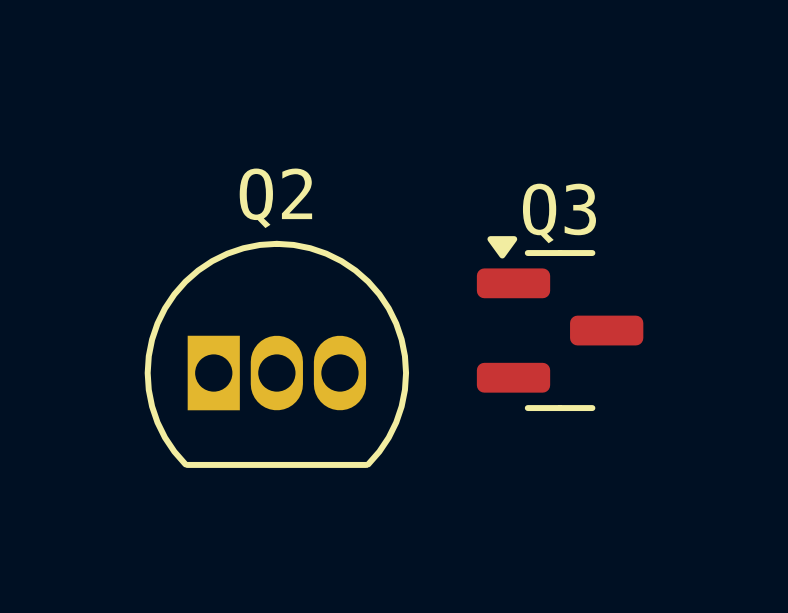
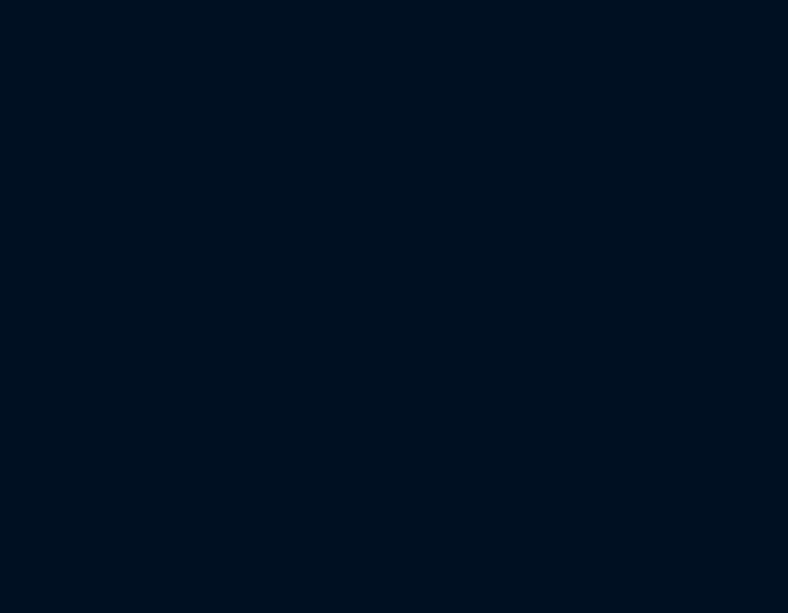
Q3: (560, 323) -> none
Q2: (276, 354) -> none

